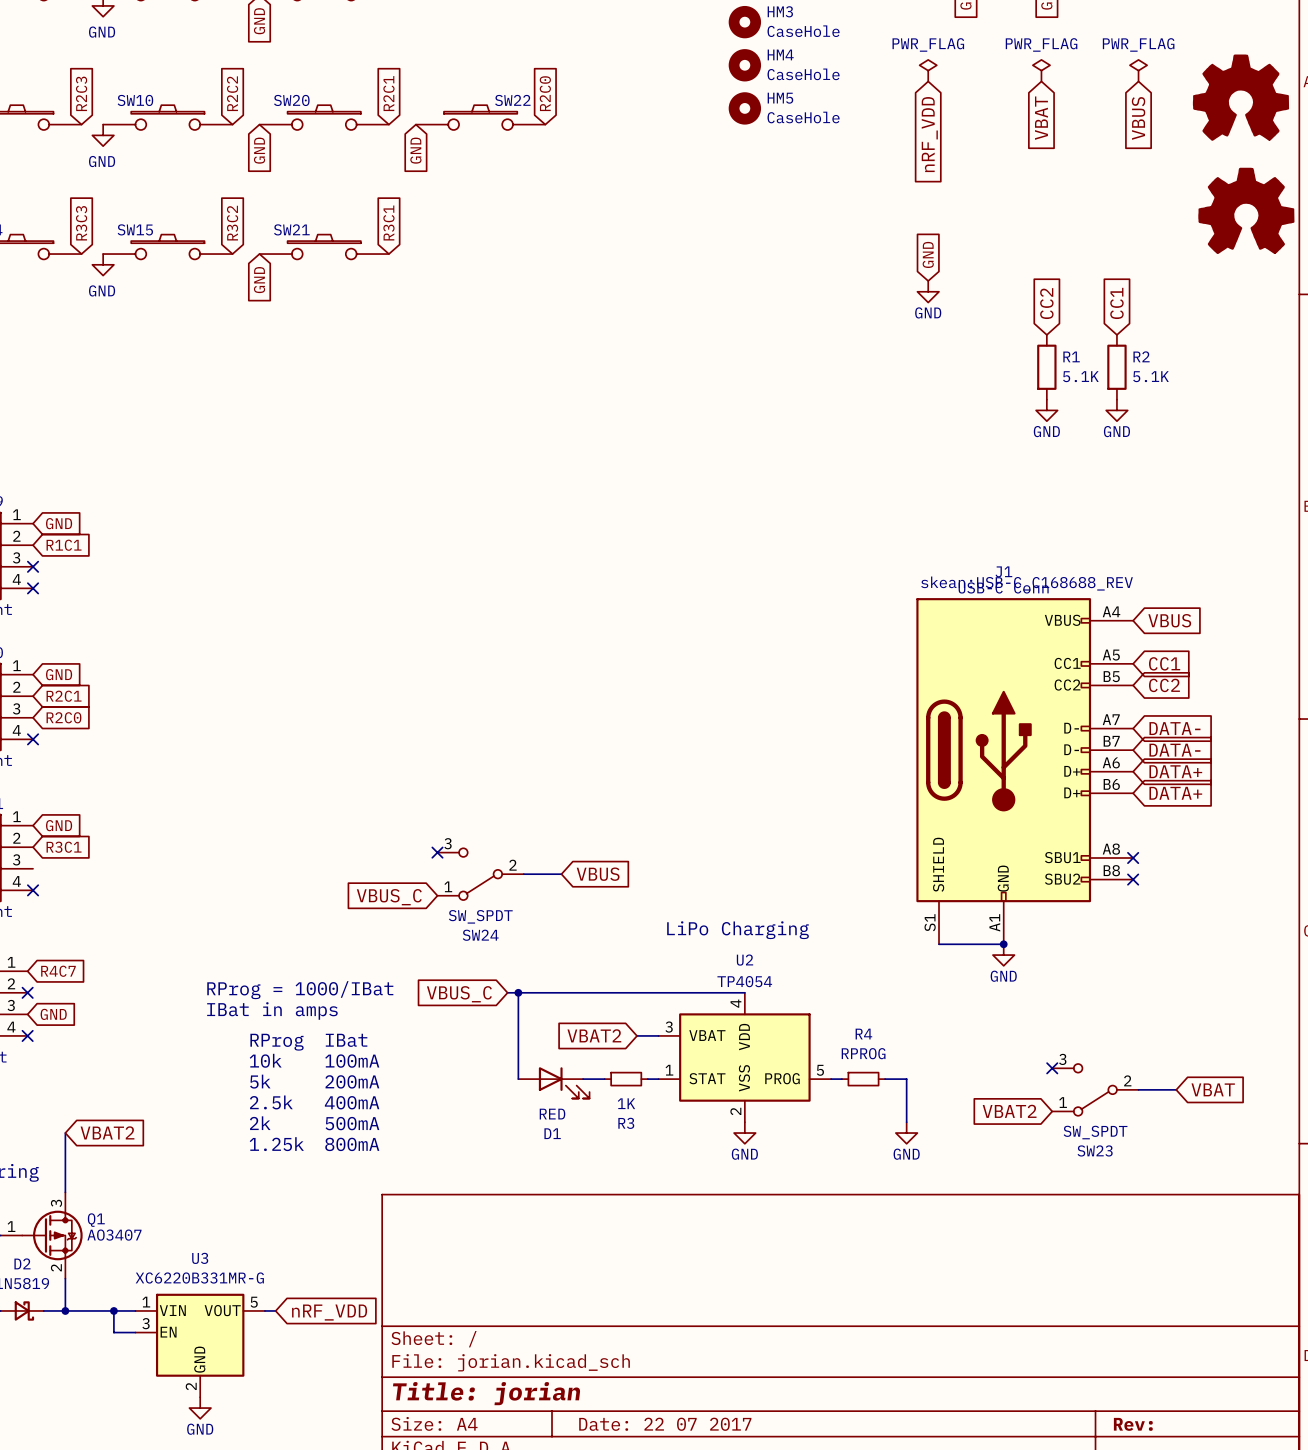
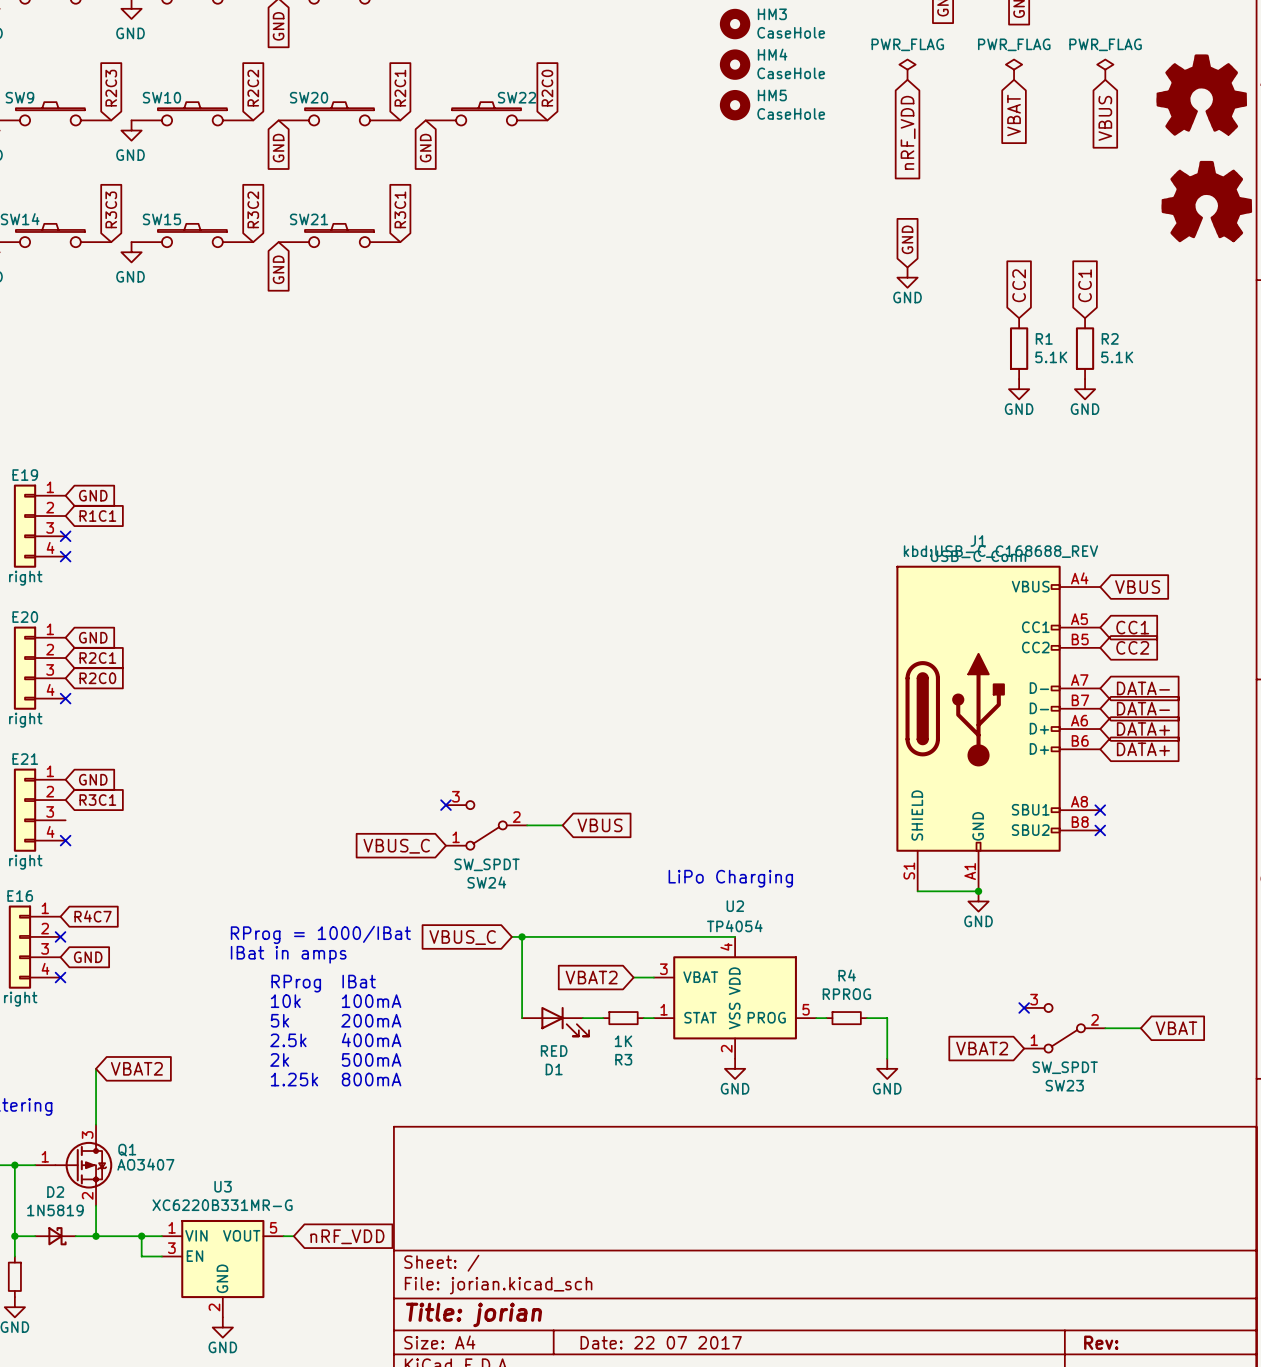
J1 text: skean:USB-C_C168688_REV (1027, 583) -> kbd:USB-C_C168688_REV (1000, 551)

